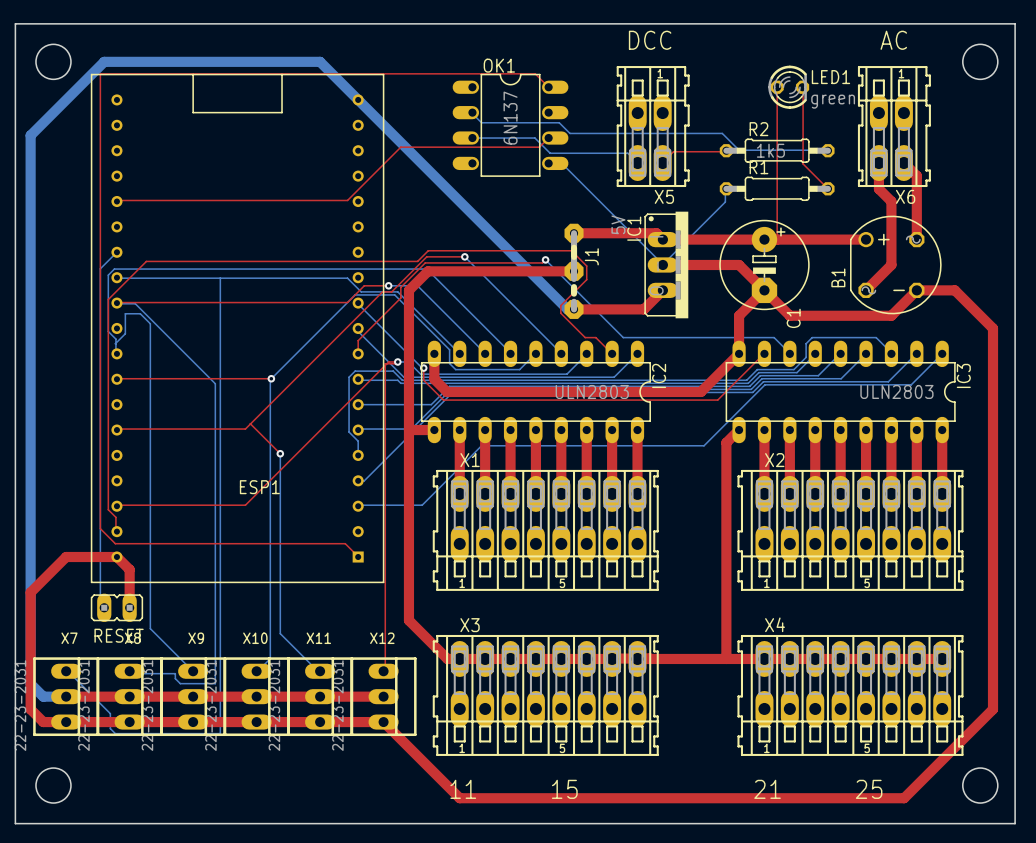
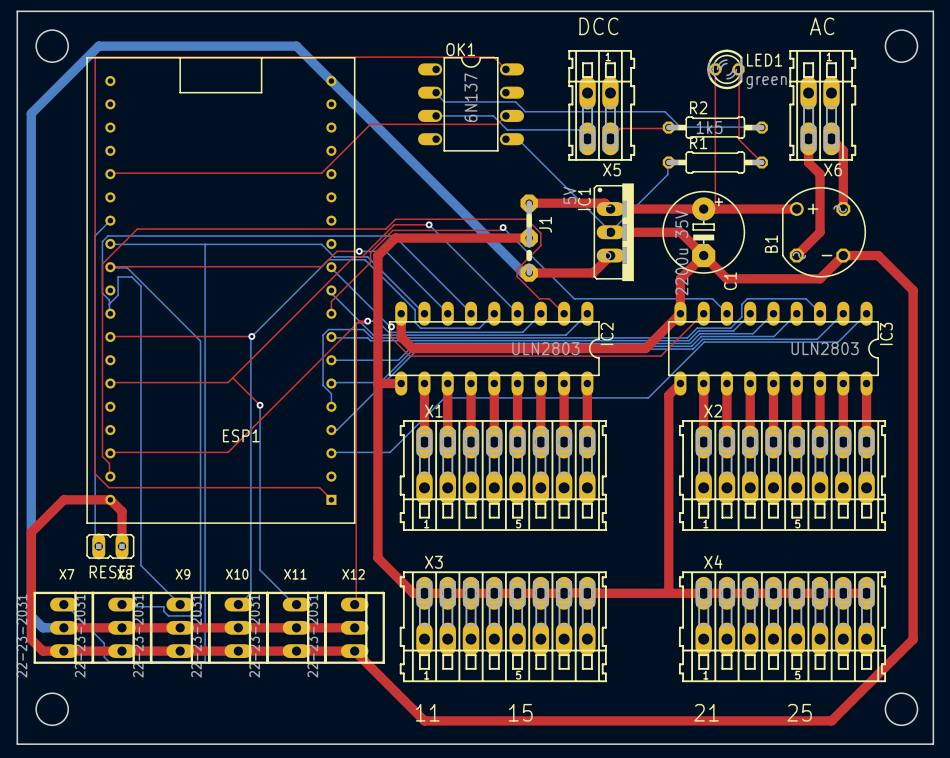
C1 value: none -> 2200u 35V (681, 252)

